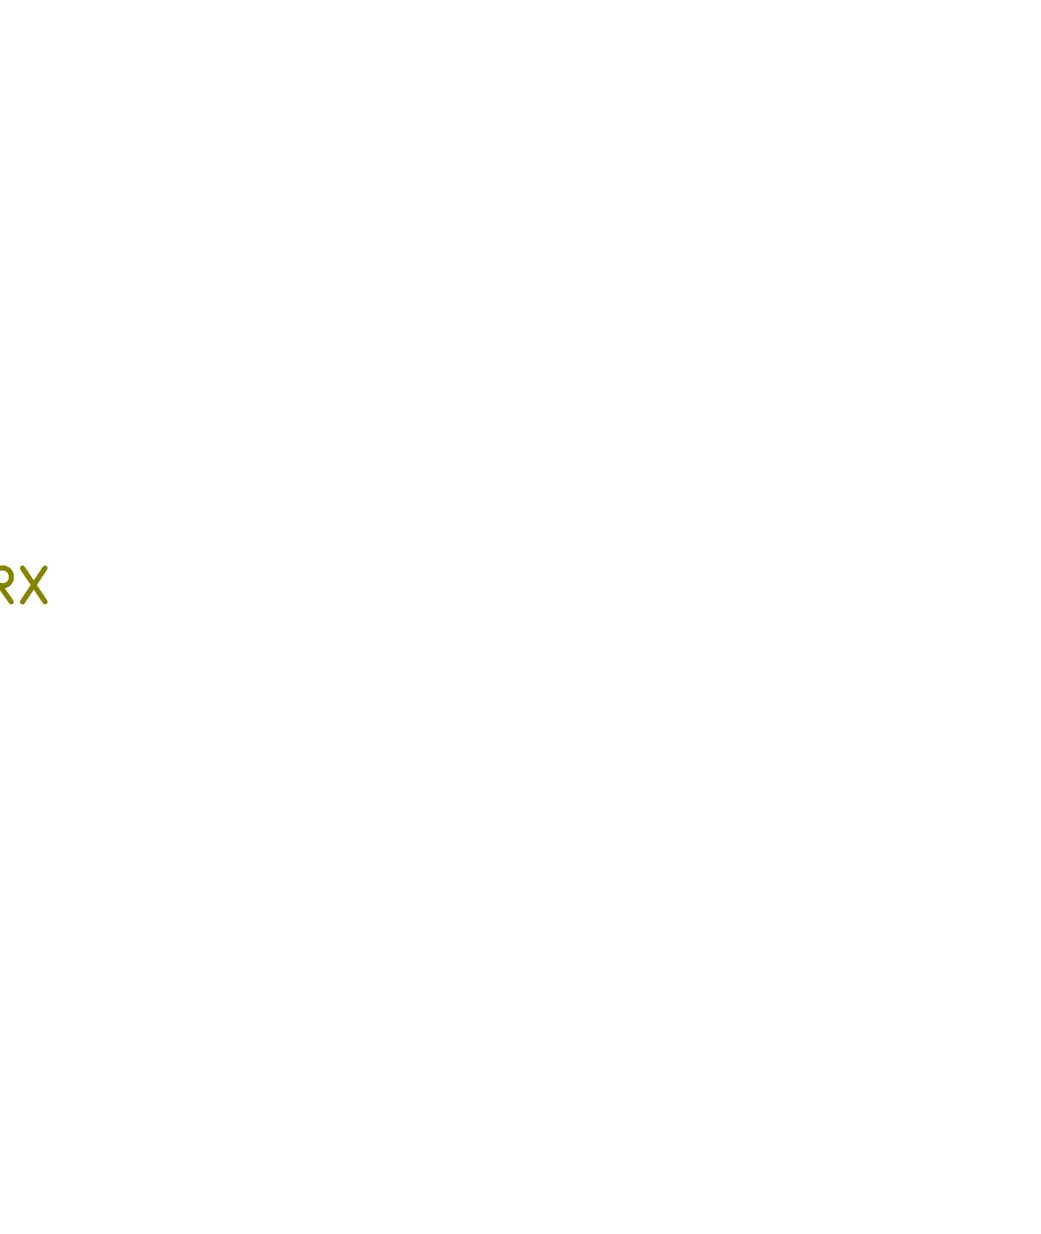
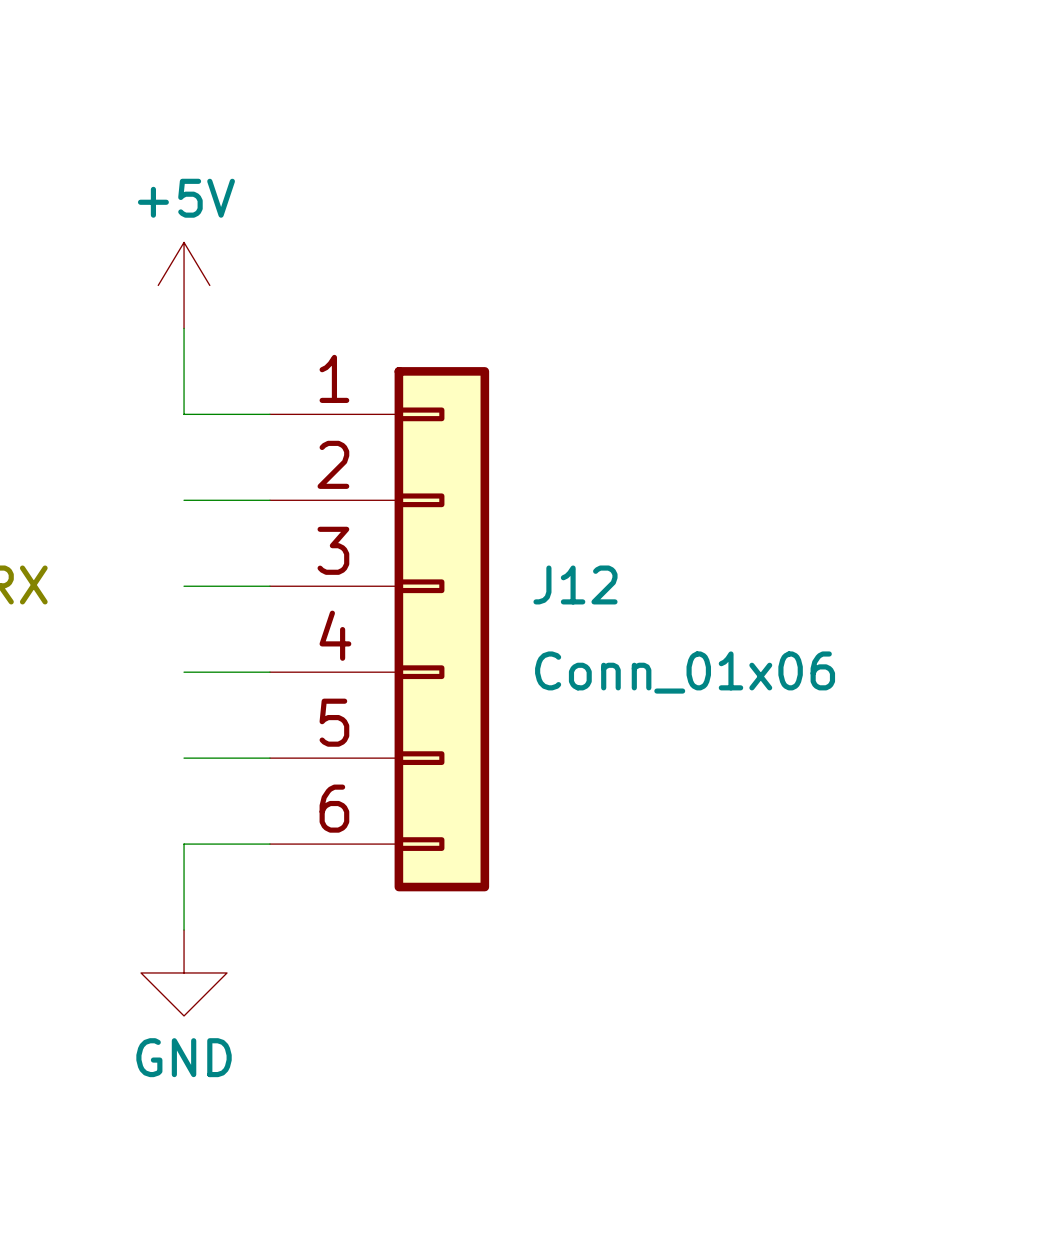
power symbol: none -> +5V (184, 285)
wire: none -> (184, 328) (184, 414) (269, 414)
wire: none -> (184, 500) (269, 500)
wire: none -> (184, 586) (269, 586)
J12: none -> Conn_01x06 (379, 629)
wire: none -> (184, 672) (269, 672)
wire: none -> (184, 758) (269, 758)
wire: none -> (269, 844) (184, 844) (184, 930)
power symbol: none -> GND (184, 972)

